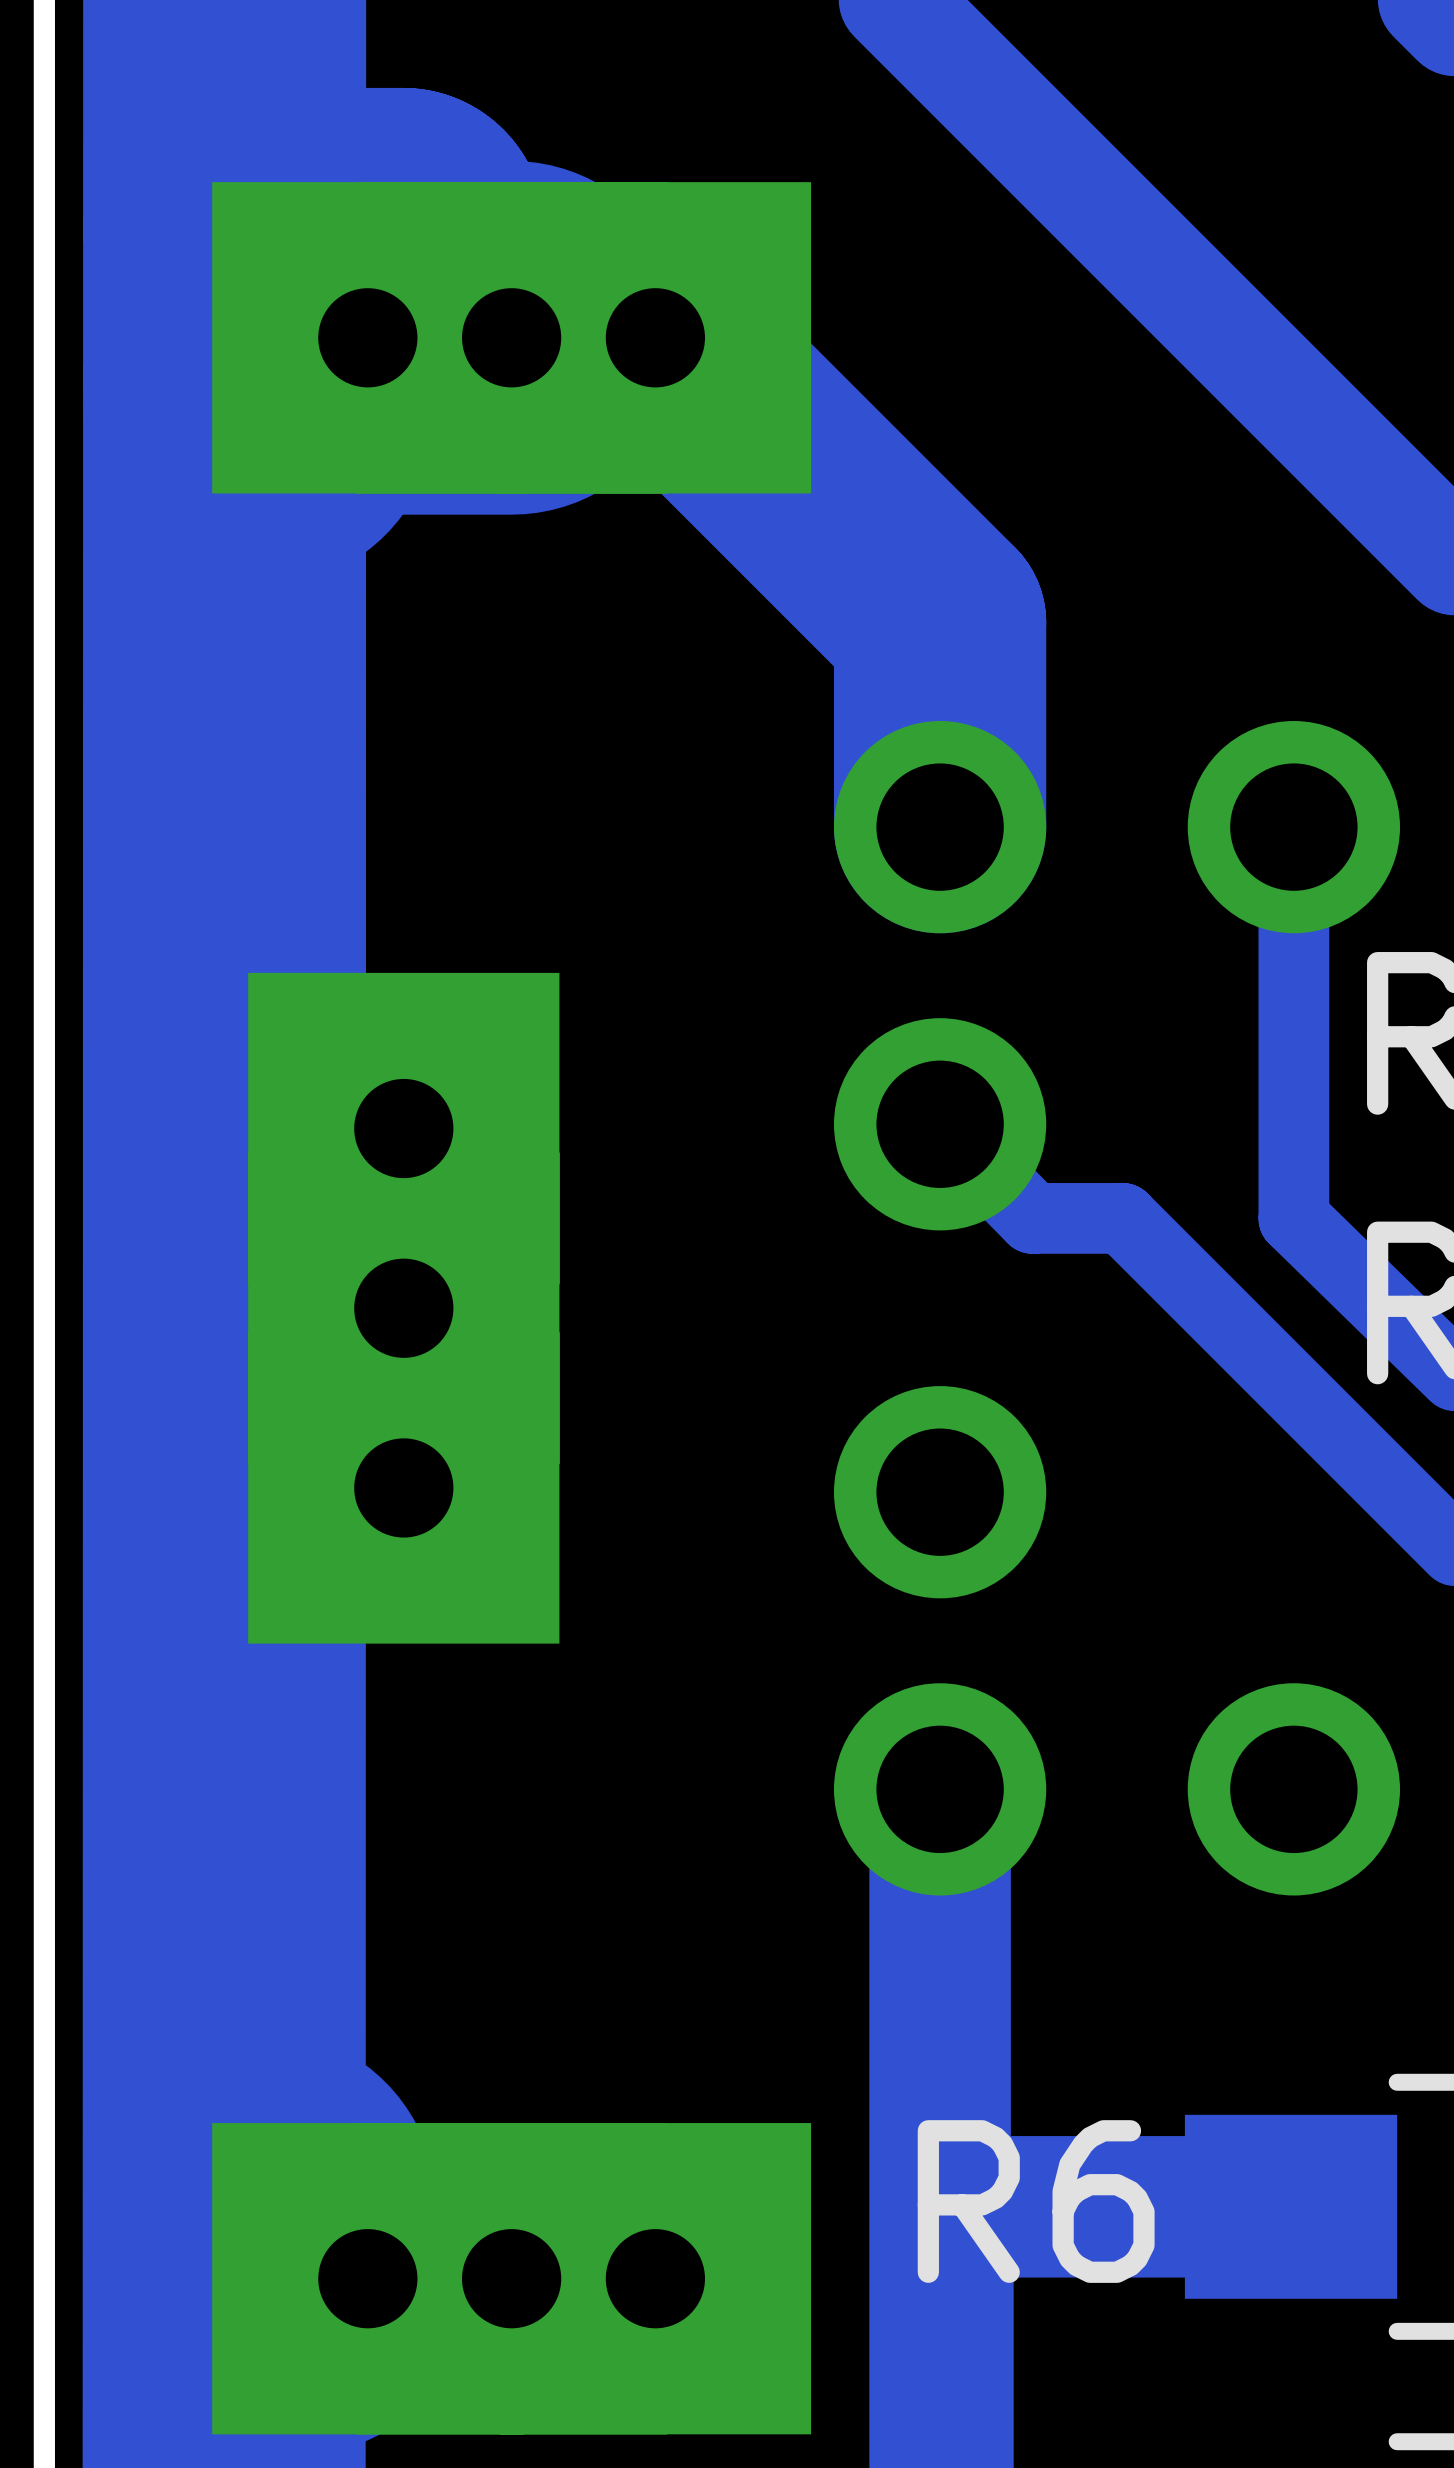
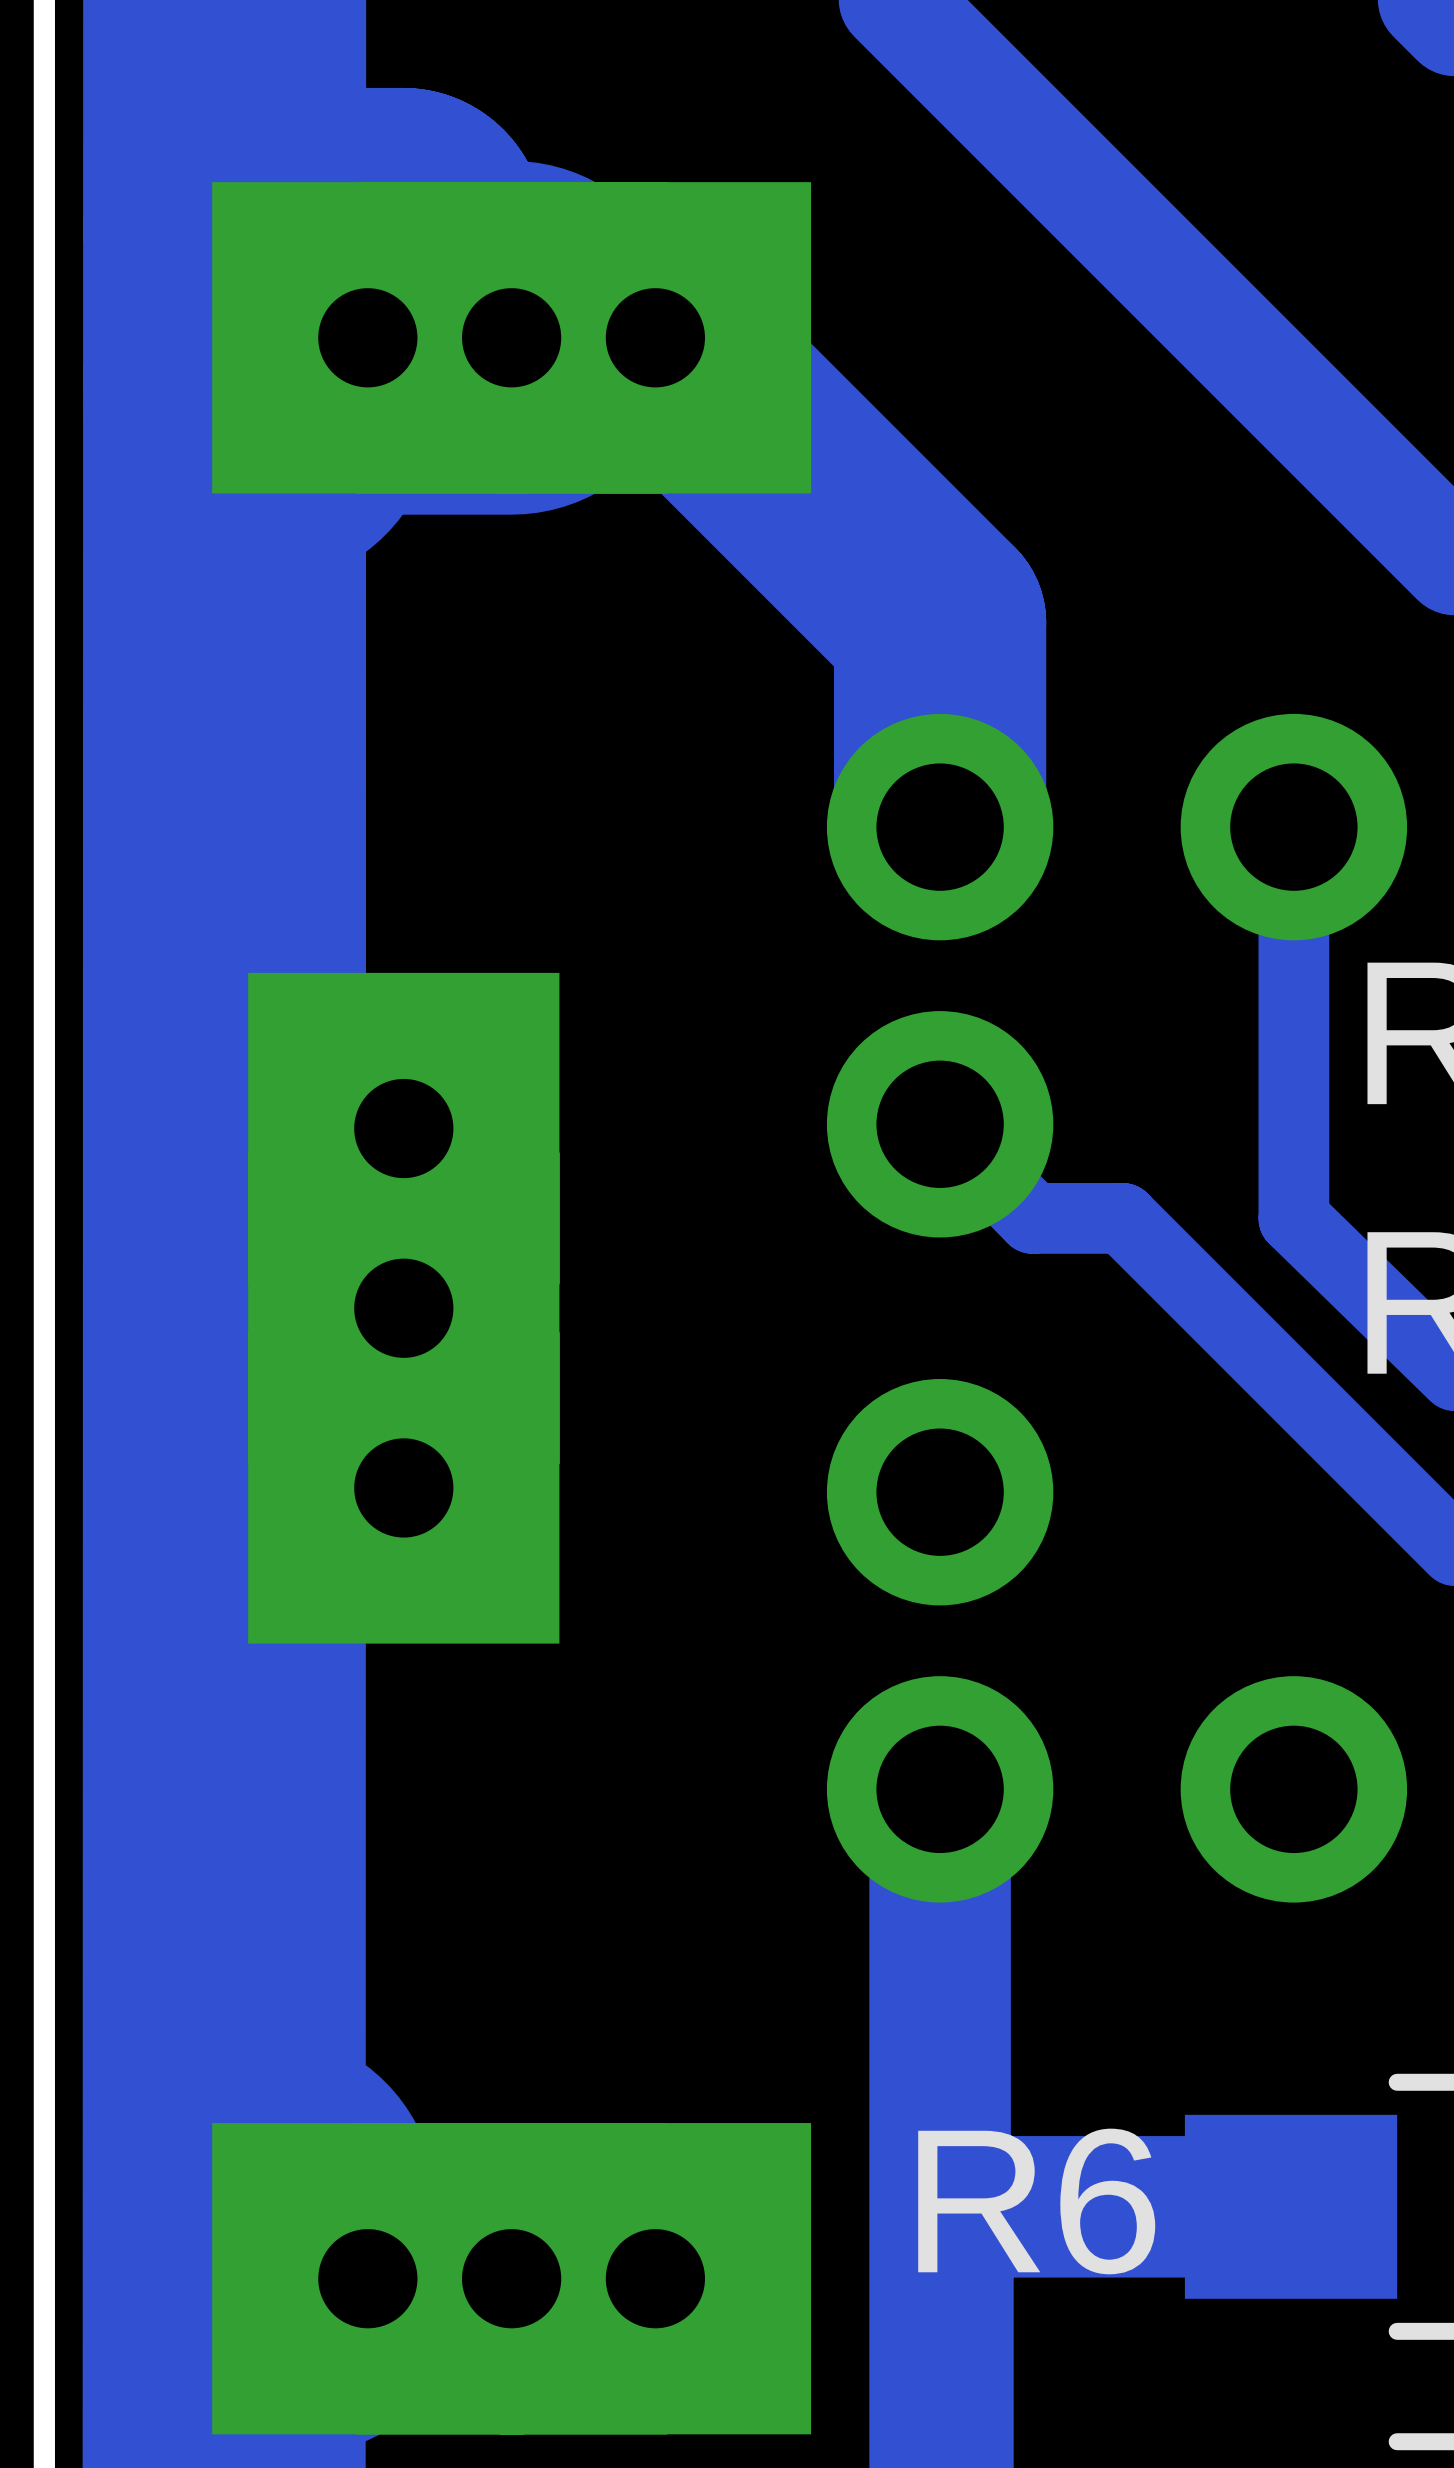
part footprint: [212, 182, 1401, 2435] -> [212, 182, 1408, 2435]

